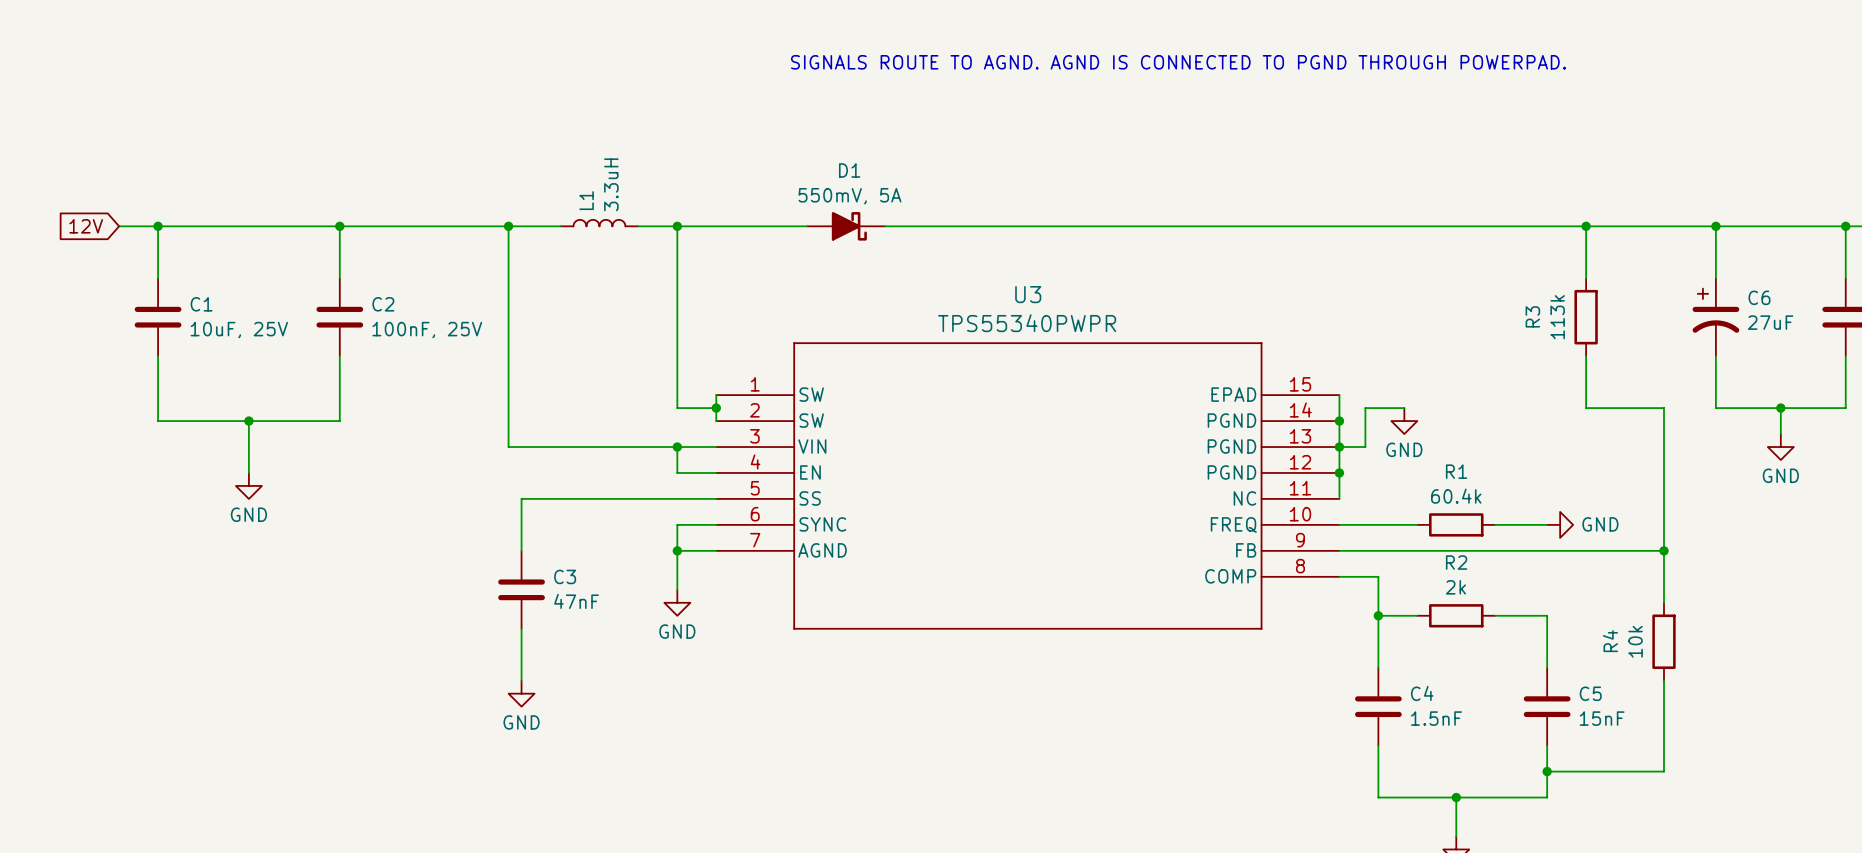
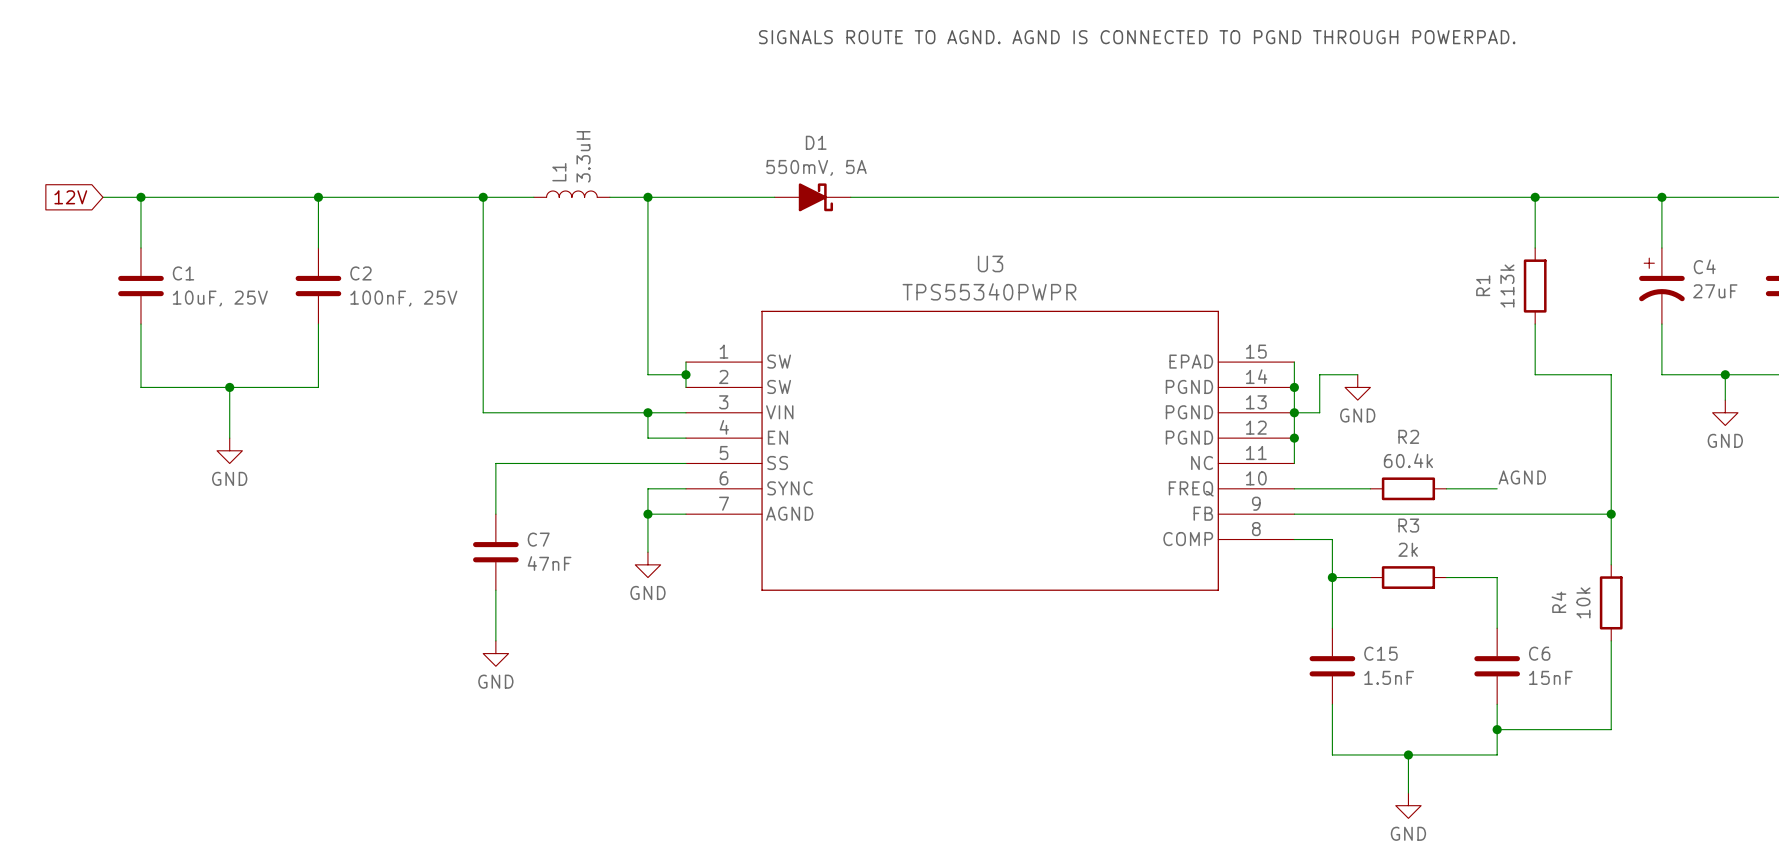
C6 name: C6 (1759, 297) -> C4 (1704, 266)
R3 name: R3 (1532, 316) -> R1 (1483, 285)
R1 name: R1 (1456, 471) -> R2 (1408, 436)
label: none -> AGND (1522, 477)
power symbol: GND (1560, 524) -> none
R2 name: R2 (1456, 562) -> R3 (1408, 525)
C3 name: C3 (565, 576) -> C7 (538, 539)
C4 name: C4 (1422, 693) -> C15 (1380, 653)
C5 name: C5 (1590, 693) -> C6 (1539, 653)

